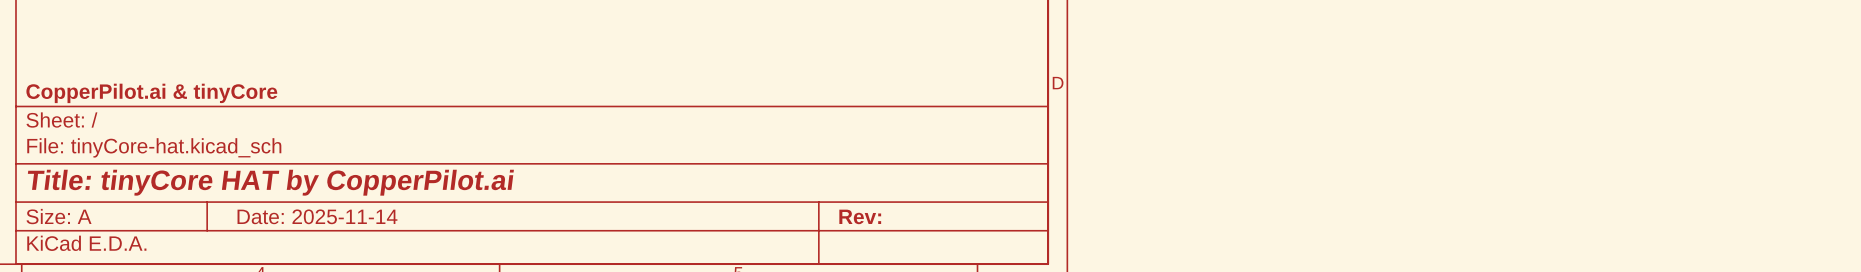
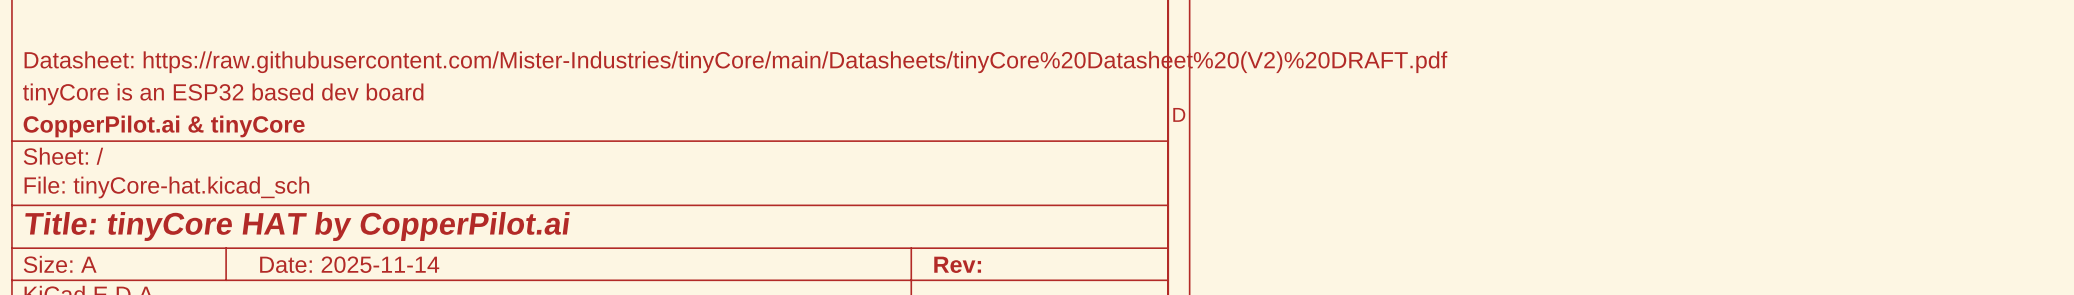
title block: none -> Datasheet: https://raw.githubusercontent.com/Mister-Industries/tinyCore/main/Datasheets/tinyCore%20Datasheet%20(V2)%20DRAFT.pdf (735, 62)
title block: none -> tinyCore is an ESP32 based dev board (223, 94)

